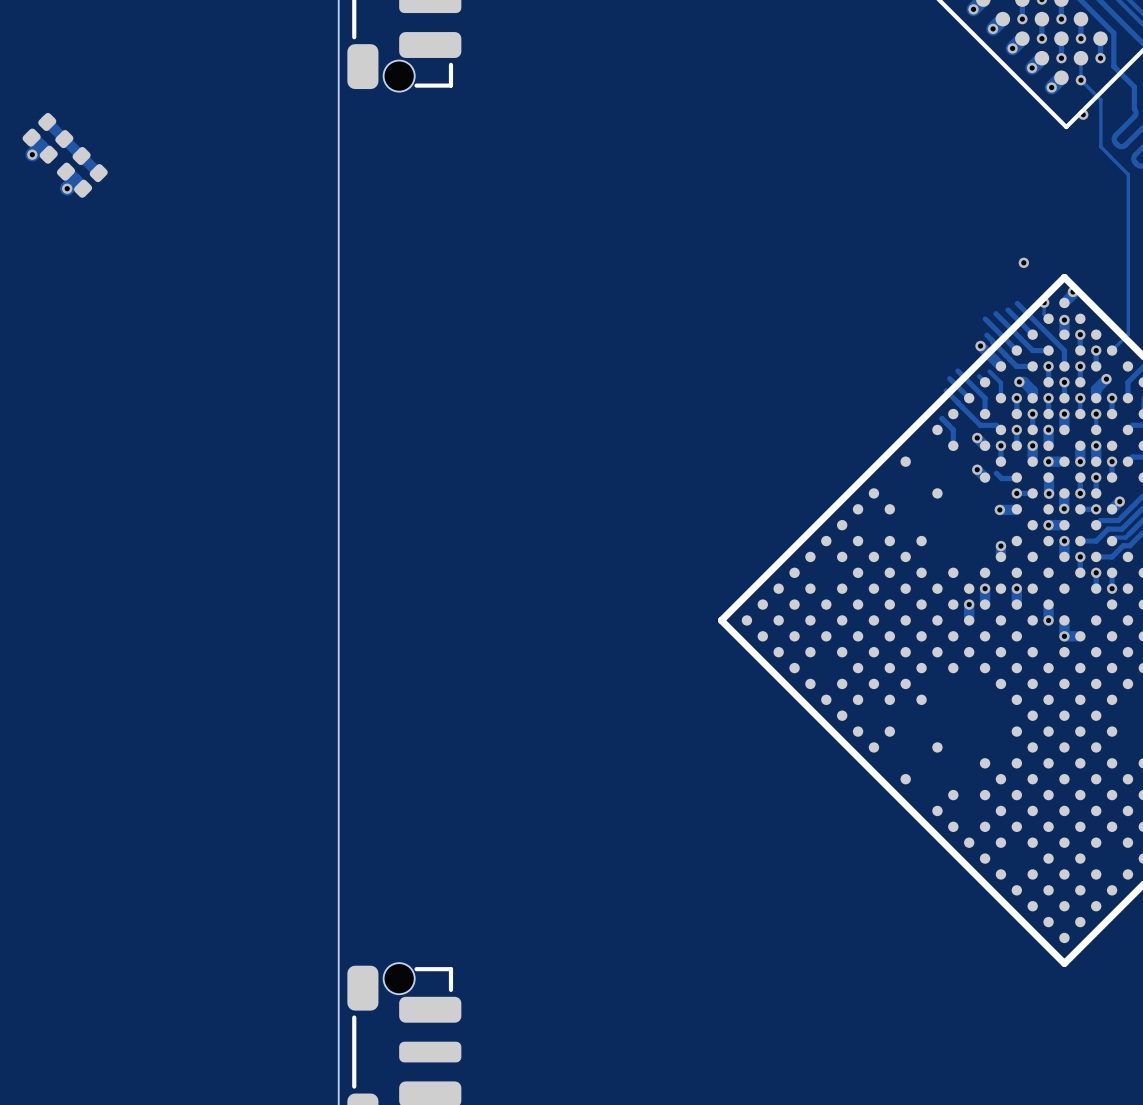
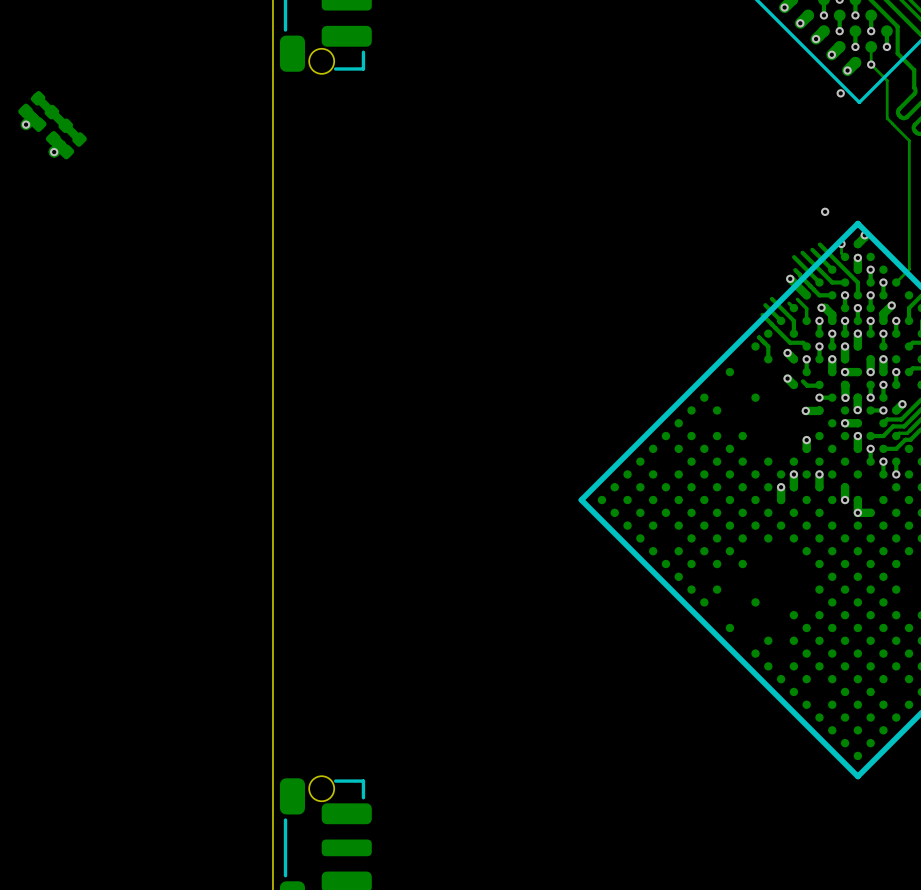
via position: (1083, 114) -> (840, 93)

